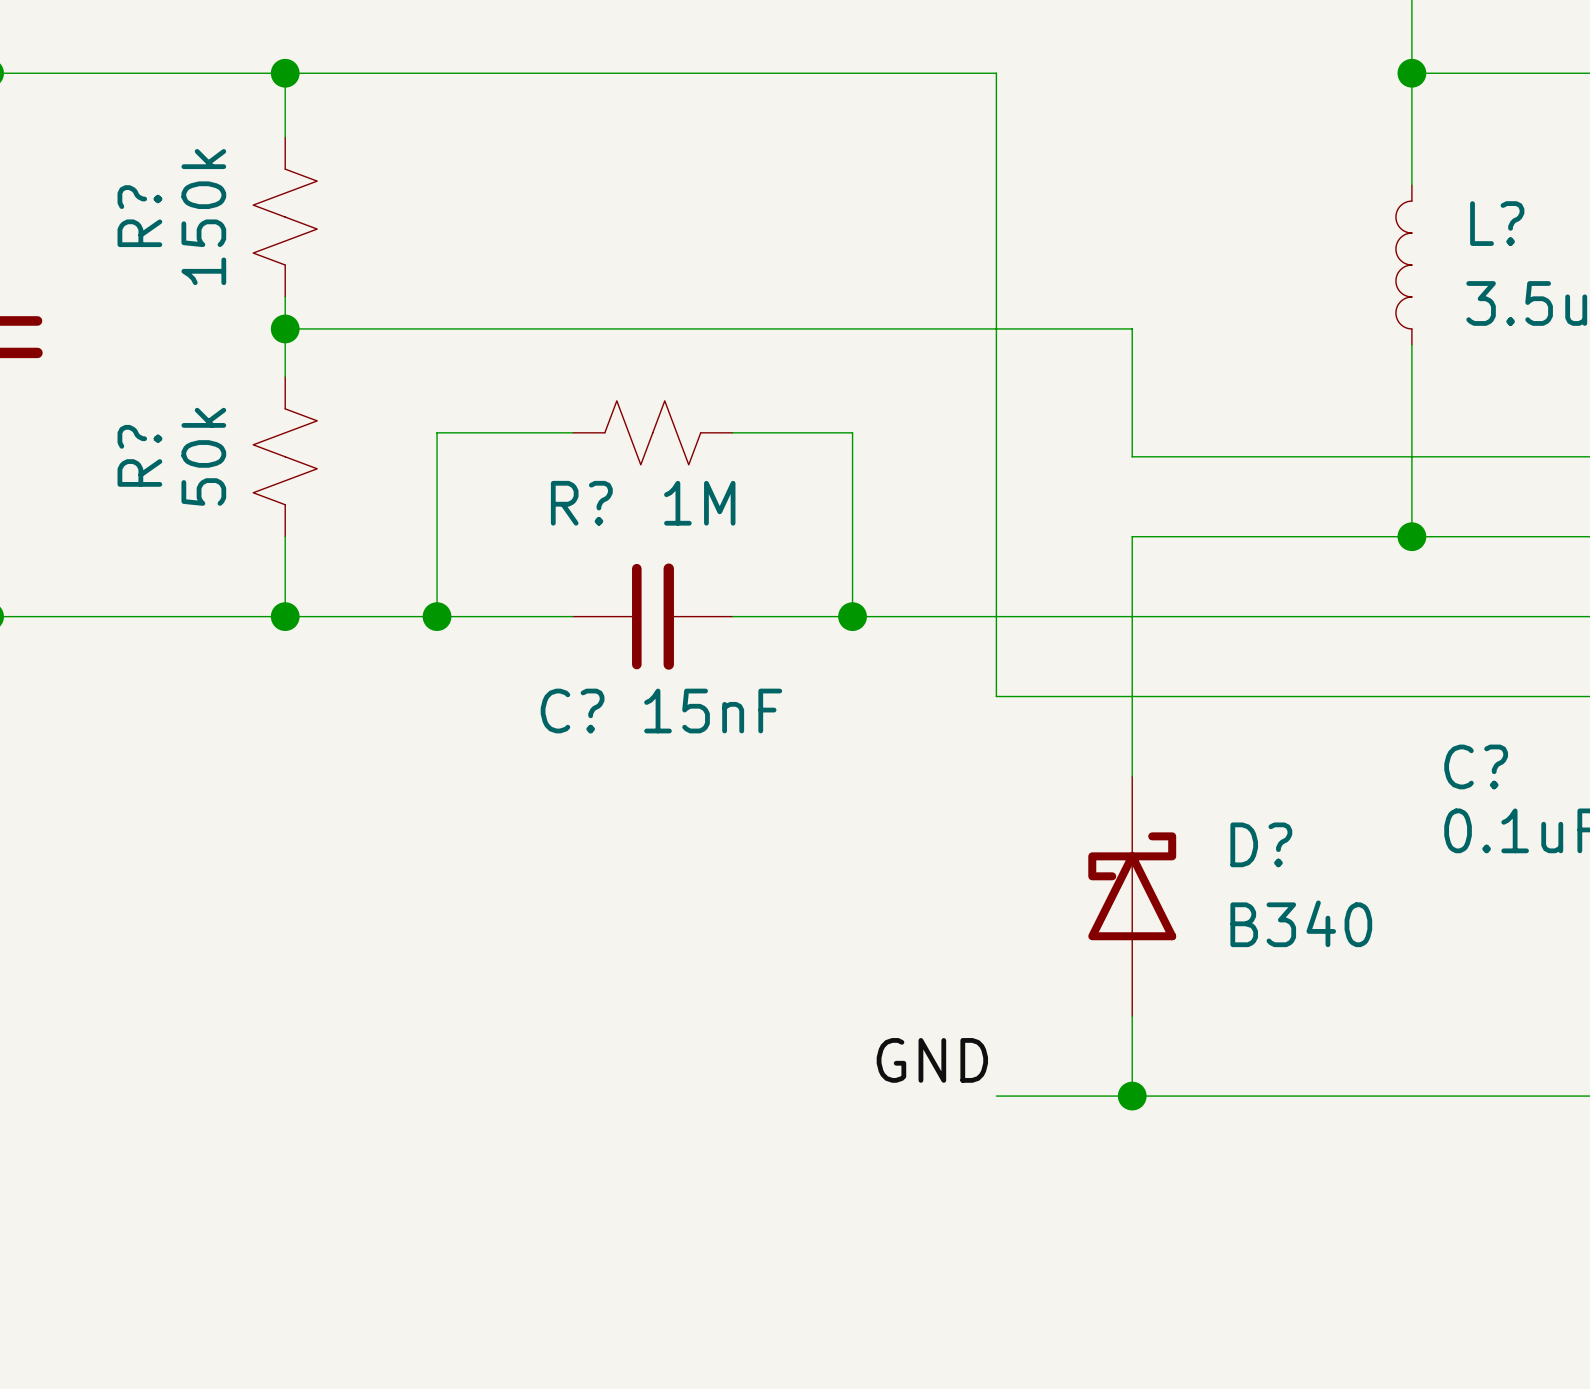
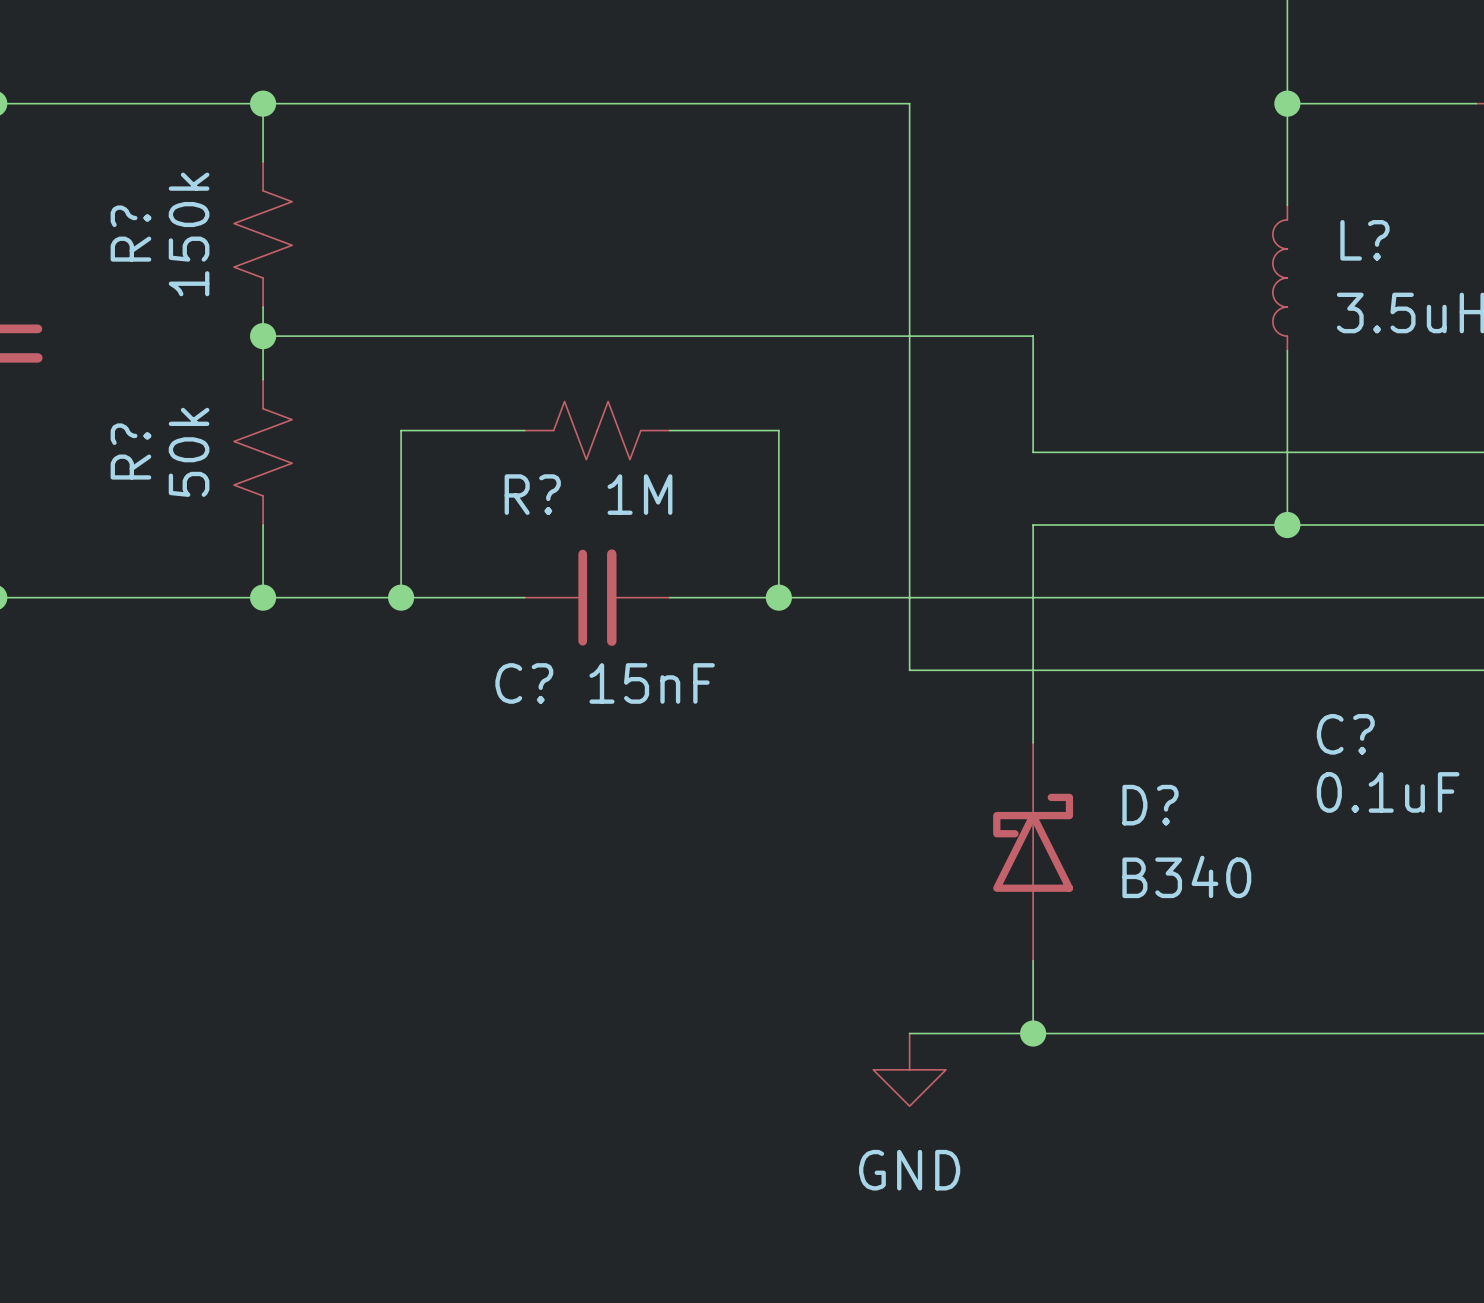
label: GND (932, 1060) -> none
power symbol: none -> GND (909, 1069)

